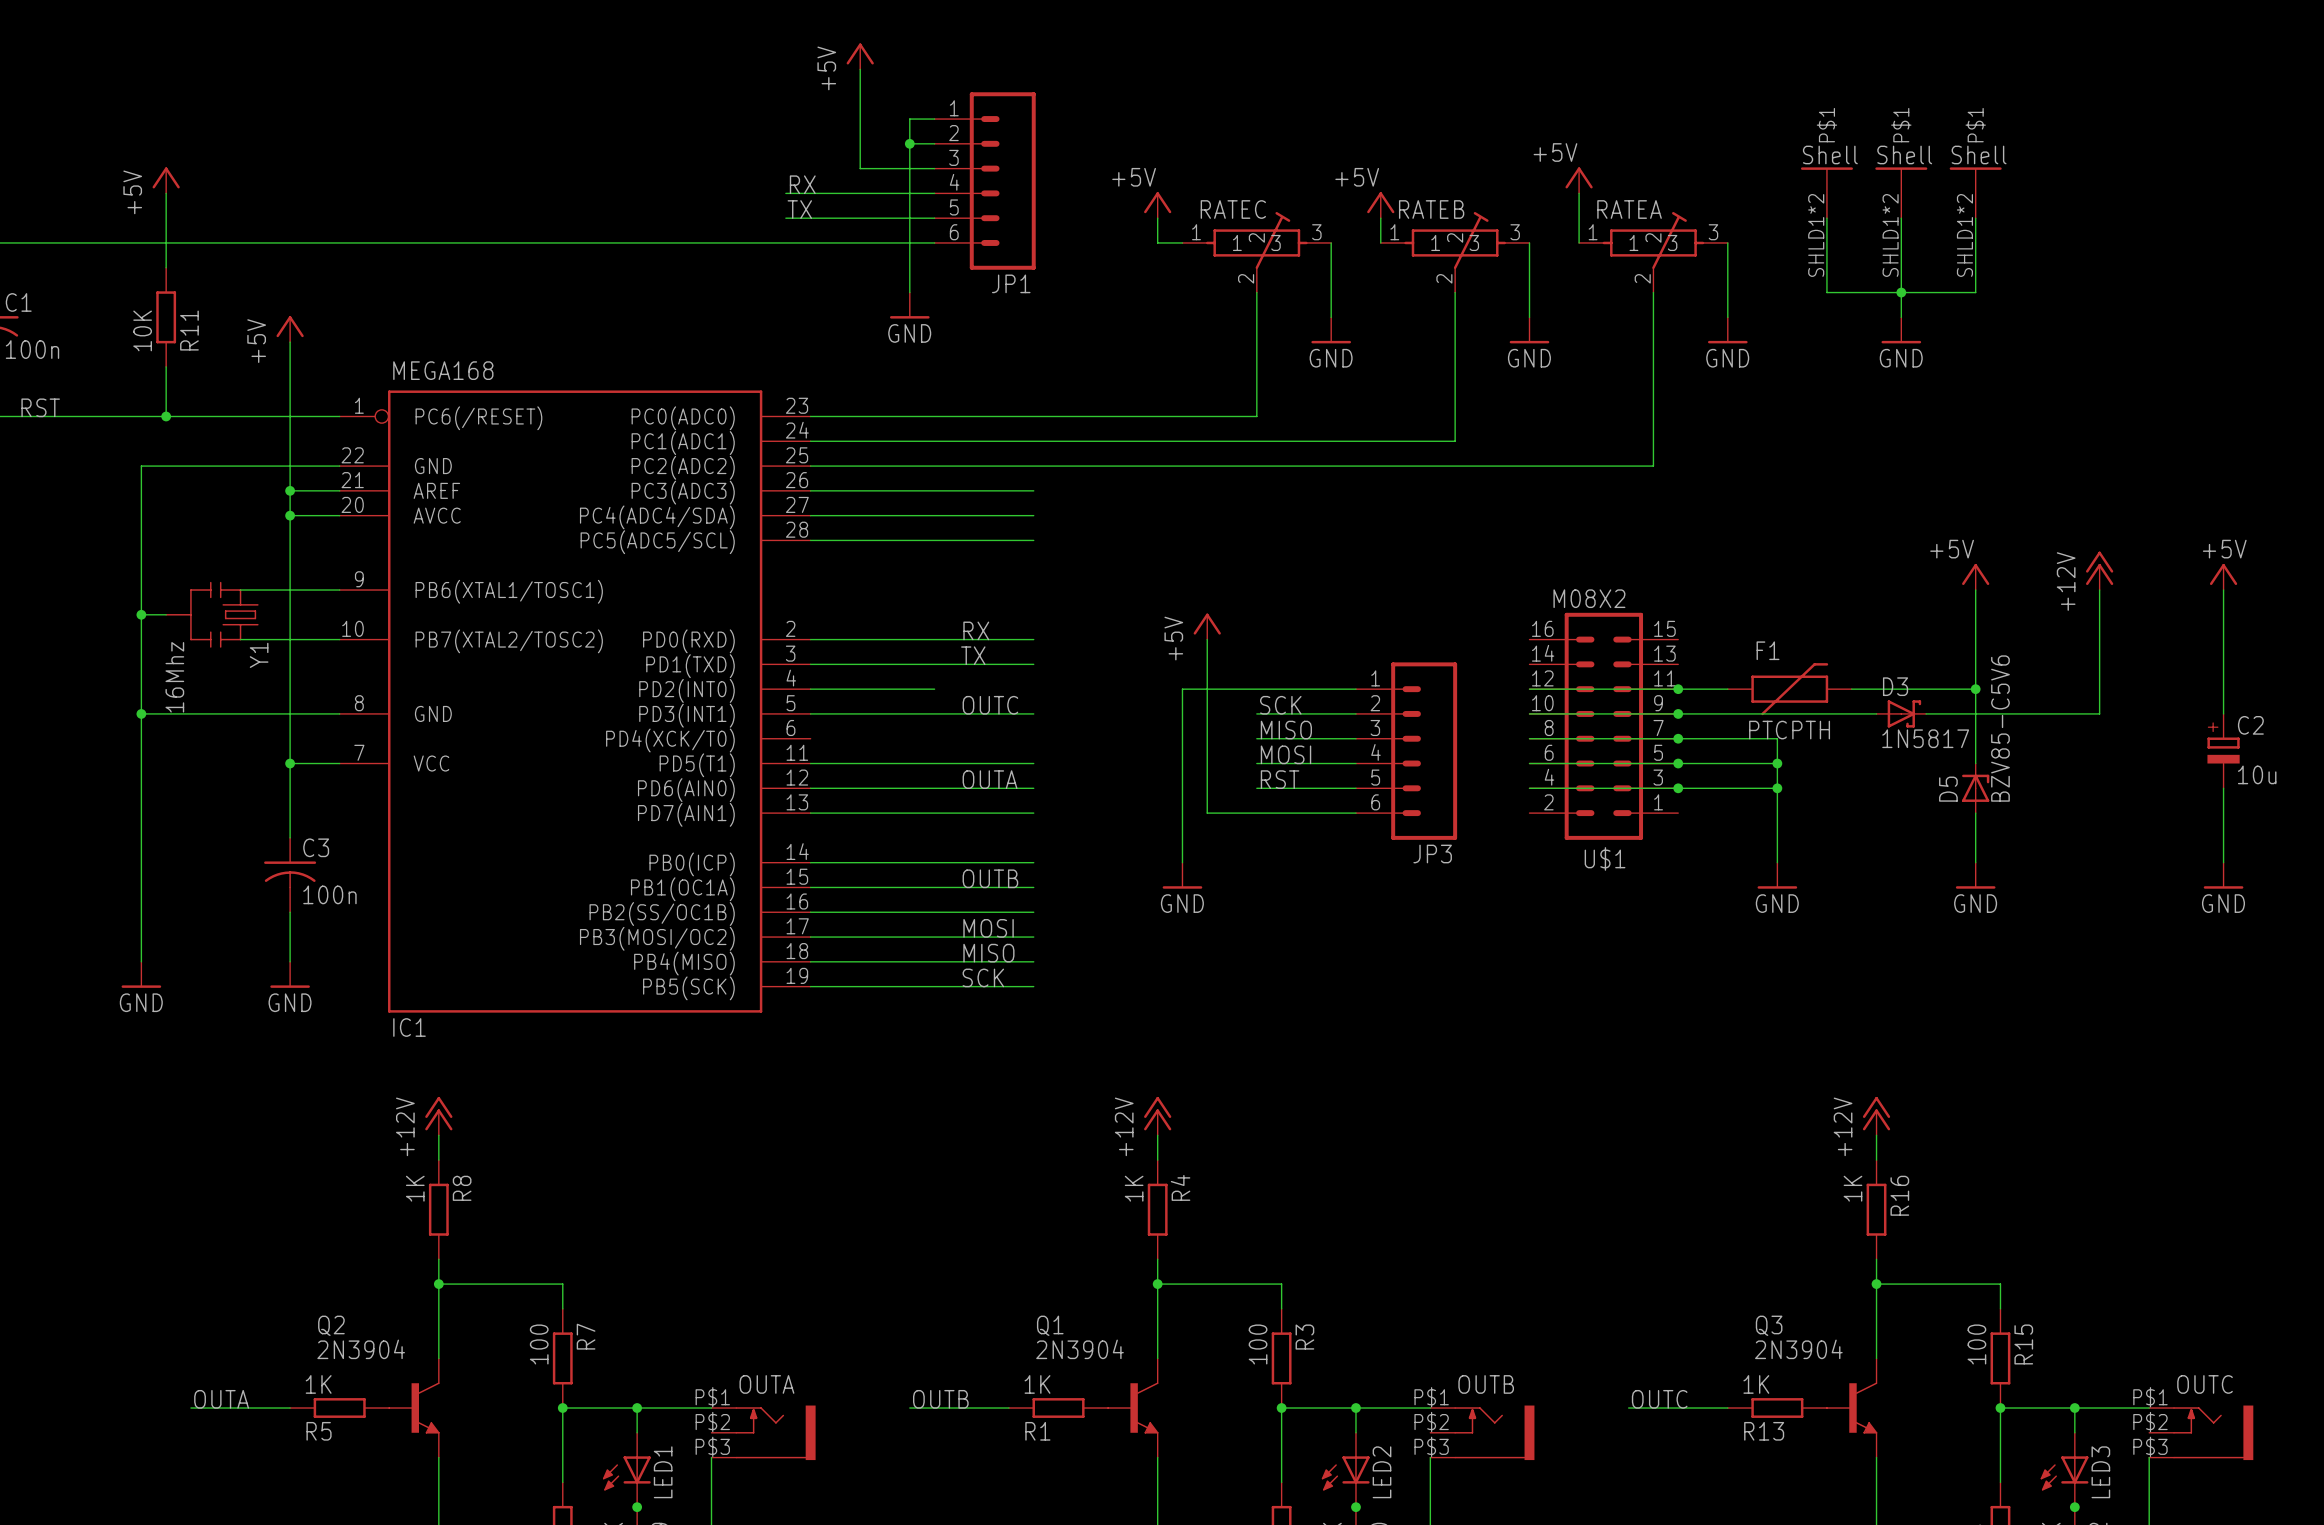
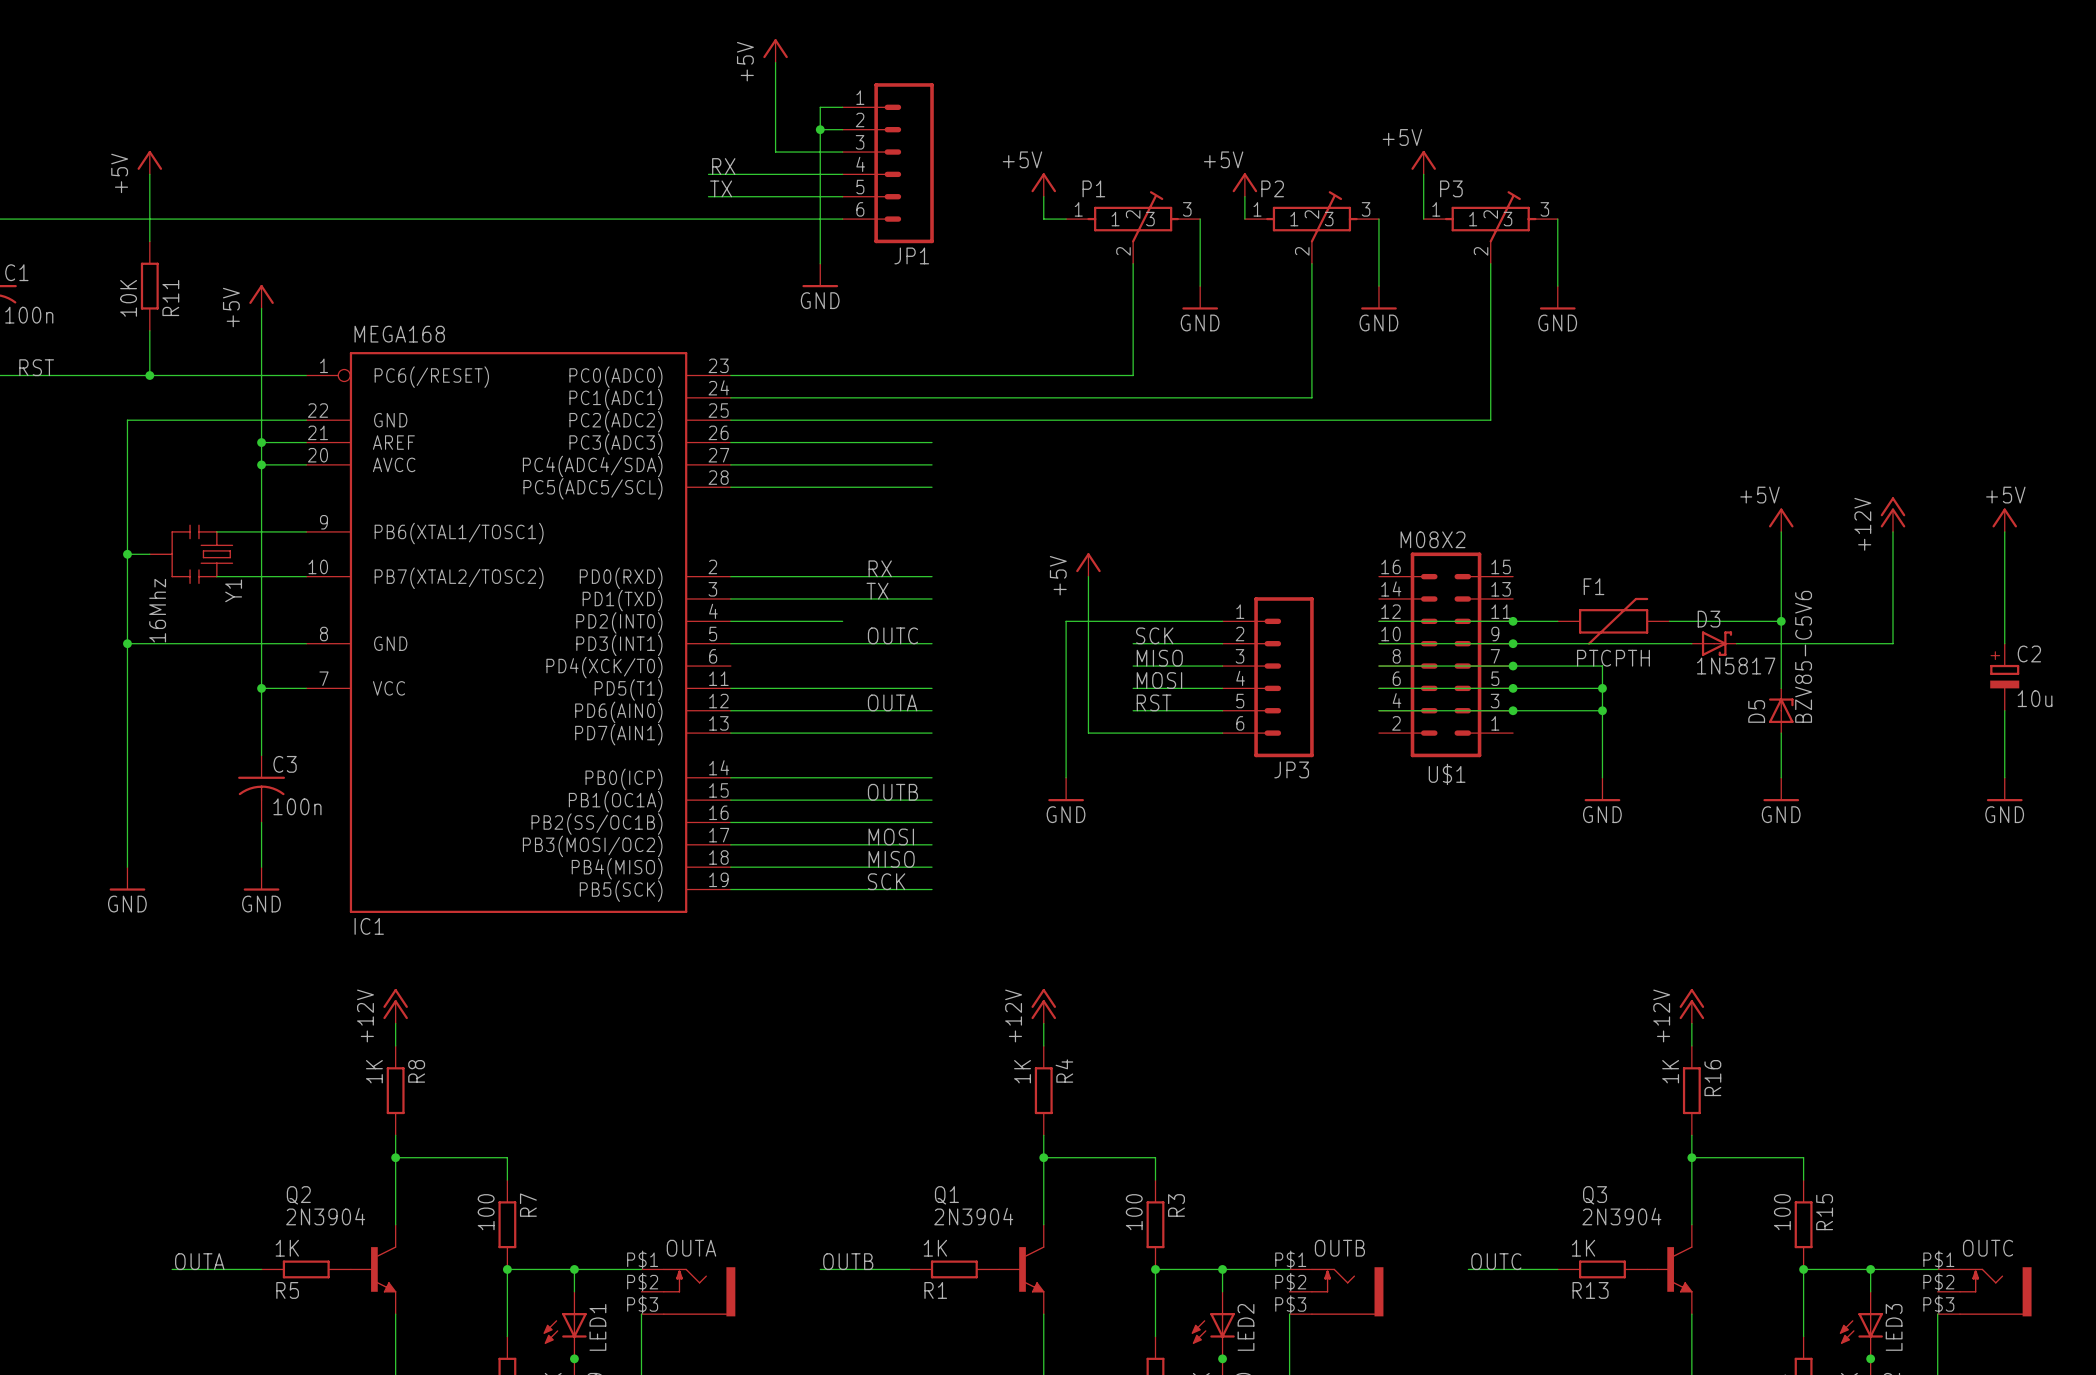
part: (1826, 192) -> none
part: (1901, 192) -> none
part: (1975, 192) -> none
RATEC name: RATEC (1233, 209) -> P1 (1093, 188)
RATEB name: RATEB (1431, 209) -> P2 (1272, 188)
RATEA name: RATEA (1629, 209) -> P3 (1451, 188)
wire: (1826, 218) (1826, 292) (1975, 292) (1975, 218) -> none
wire: (1901, 218) (1901, 317) -> none
junction: (1901, 292) -> none
power symbol: GND (1901, 330) -> none

